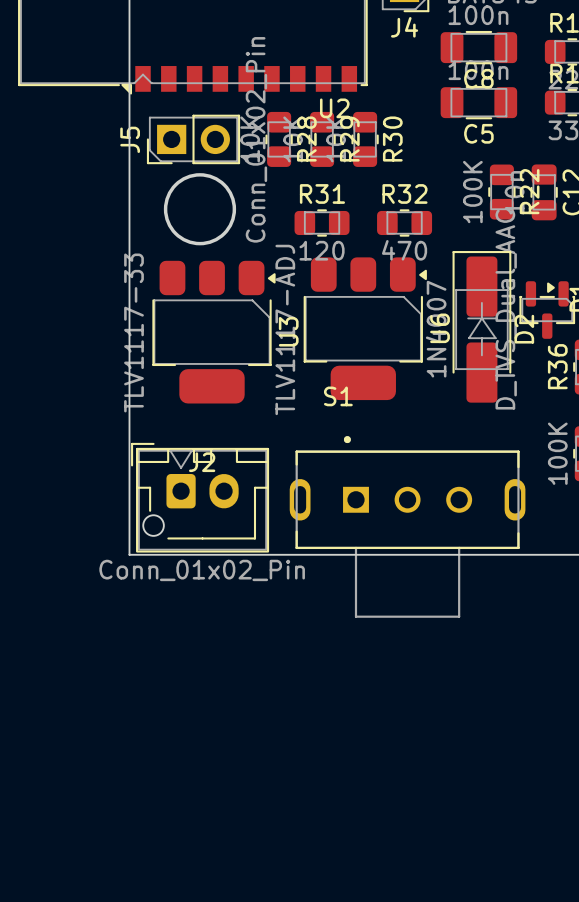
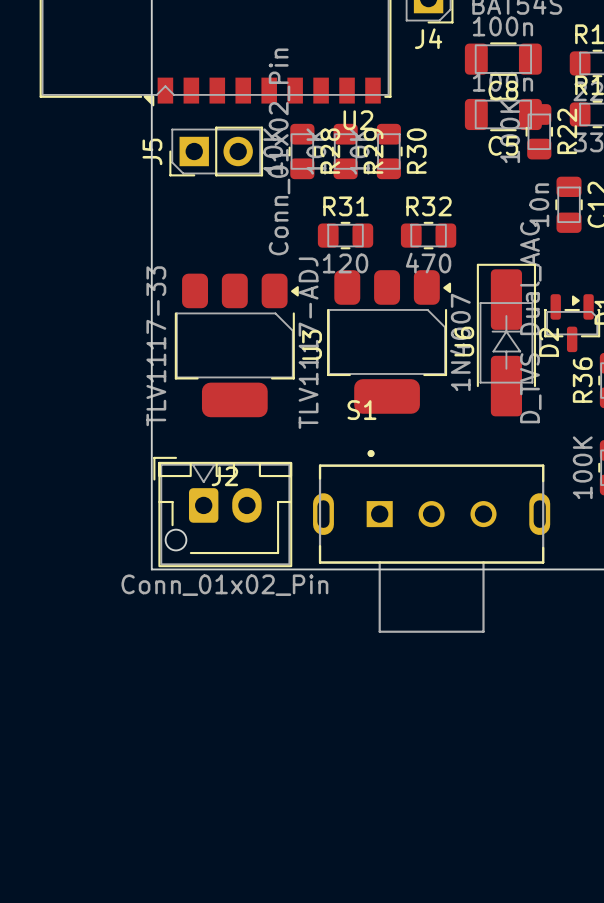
round board edge: [163, 173, 237, 246] -> none
R22 position: (501, 192) -> (539, 131)

